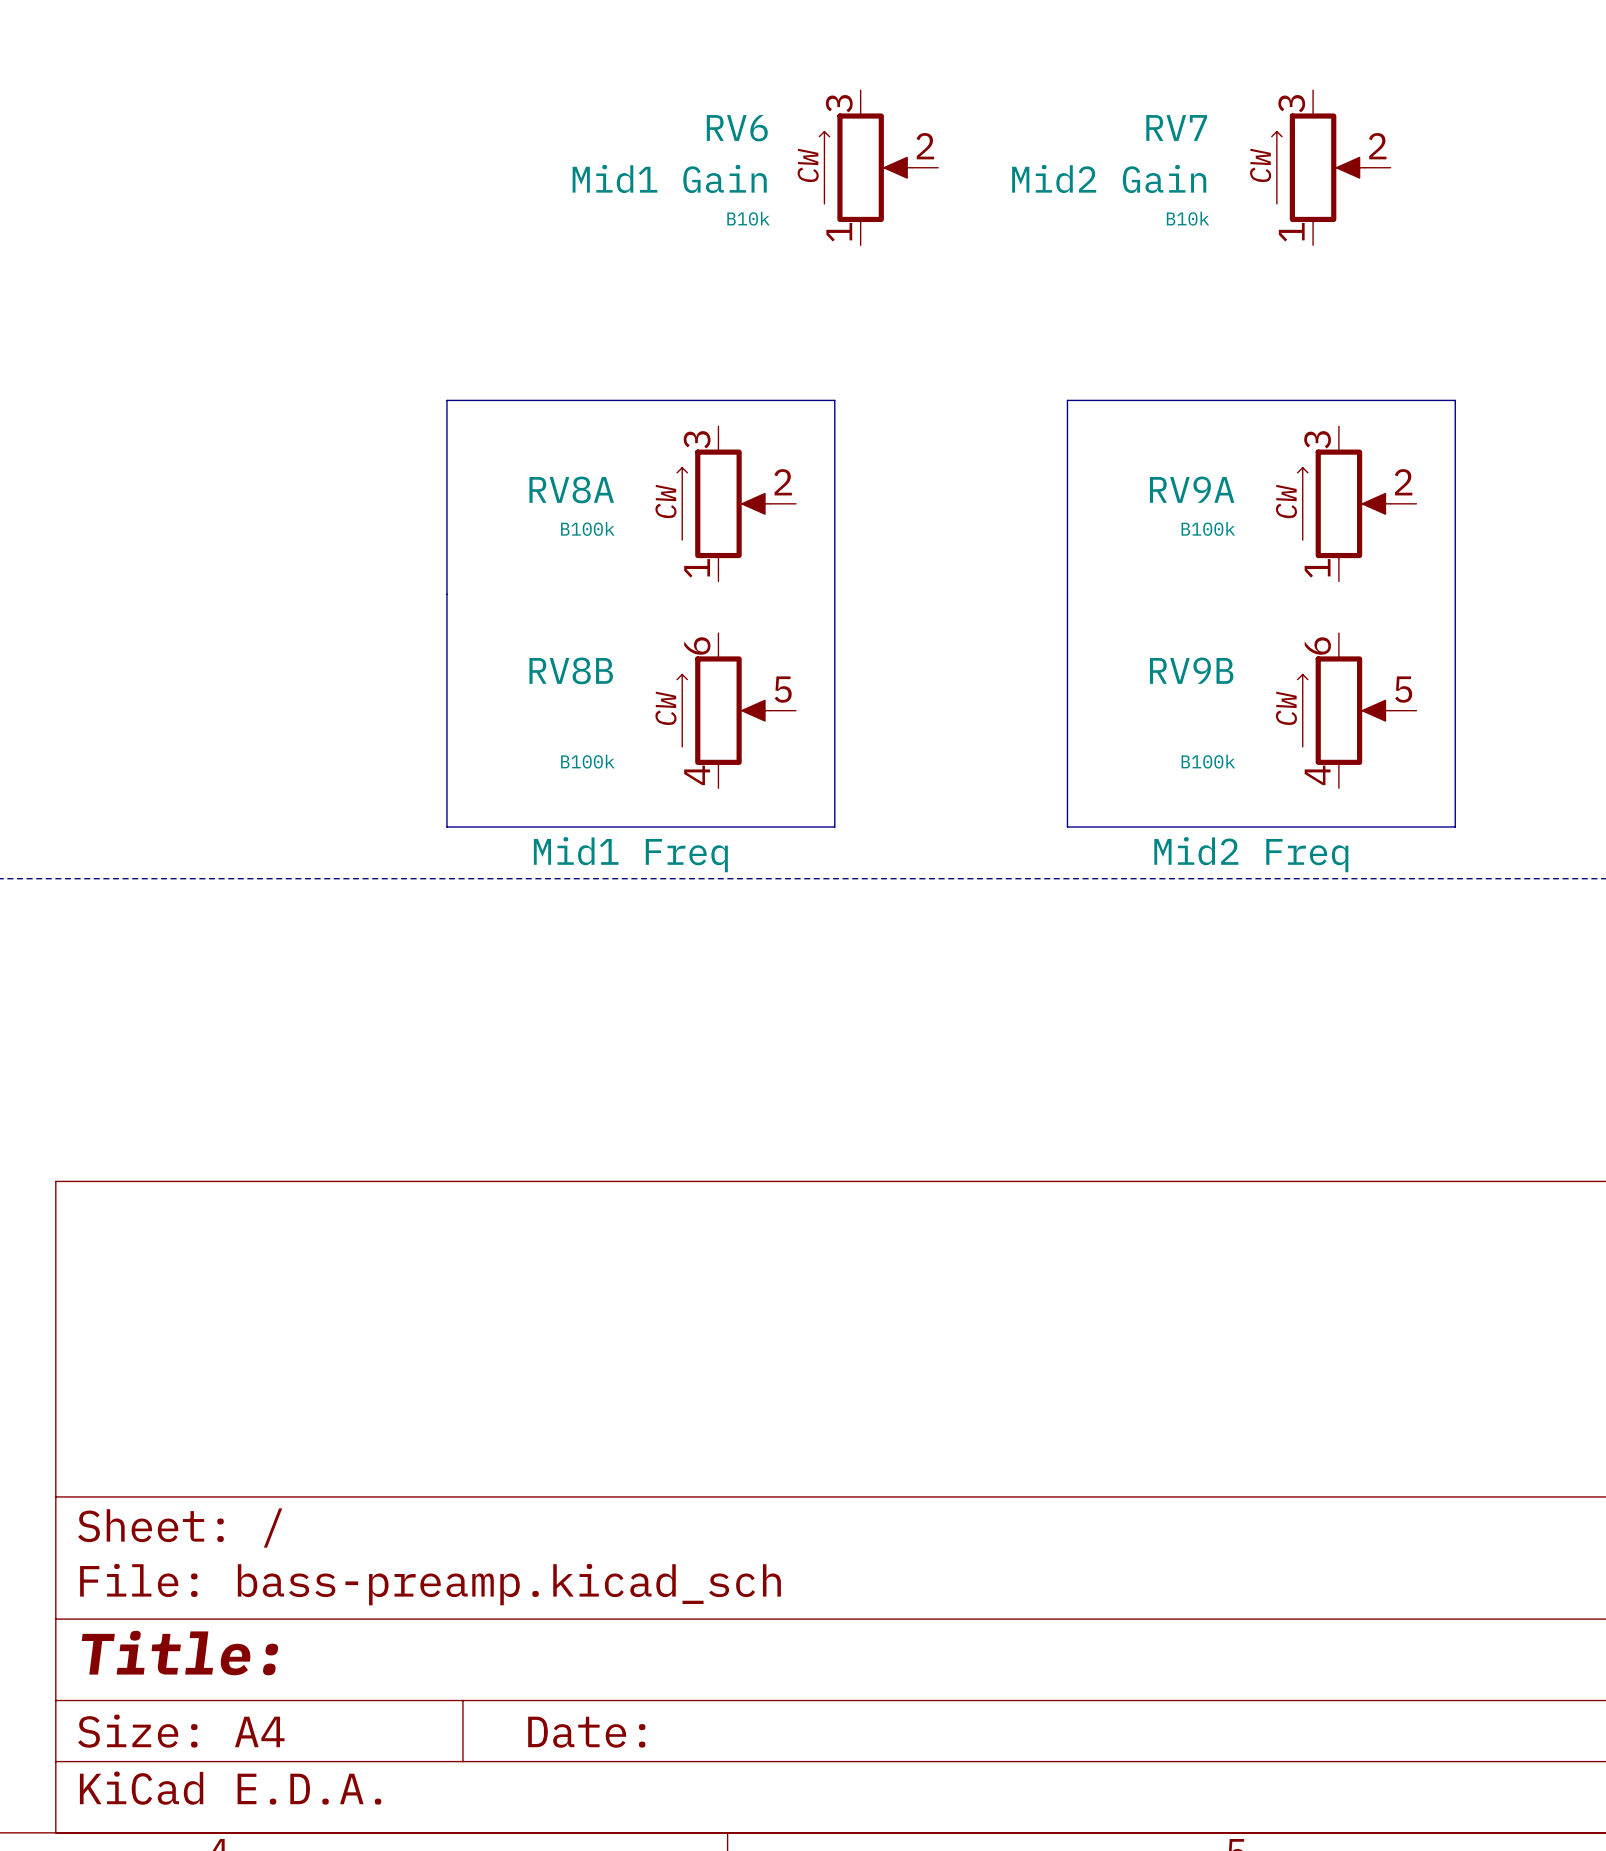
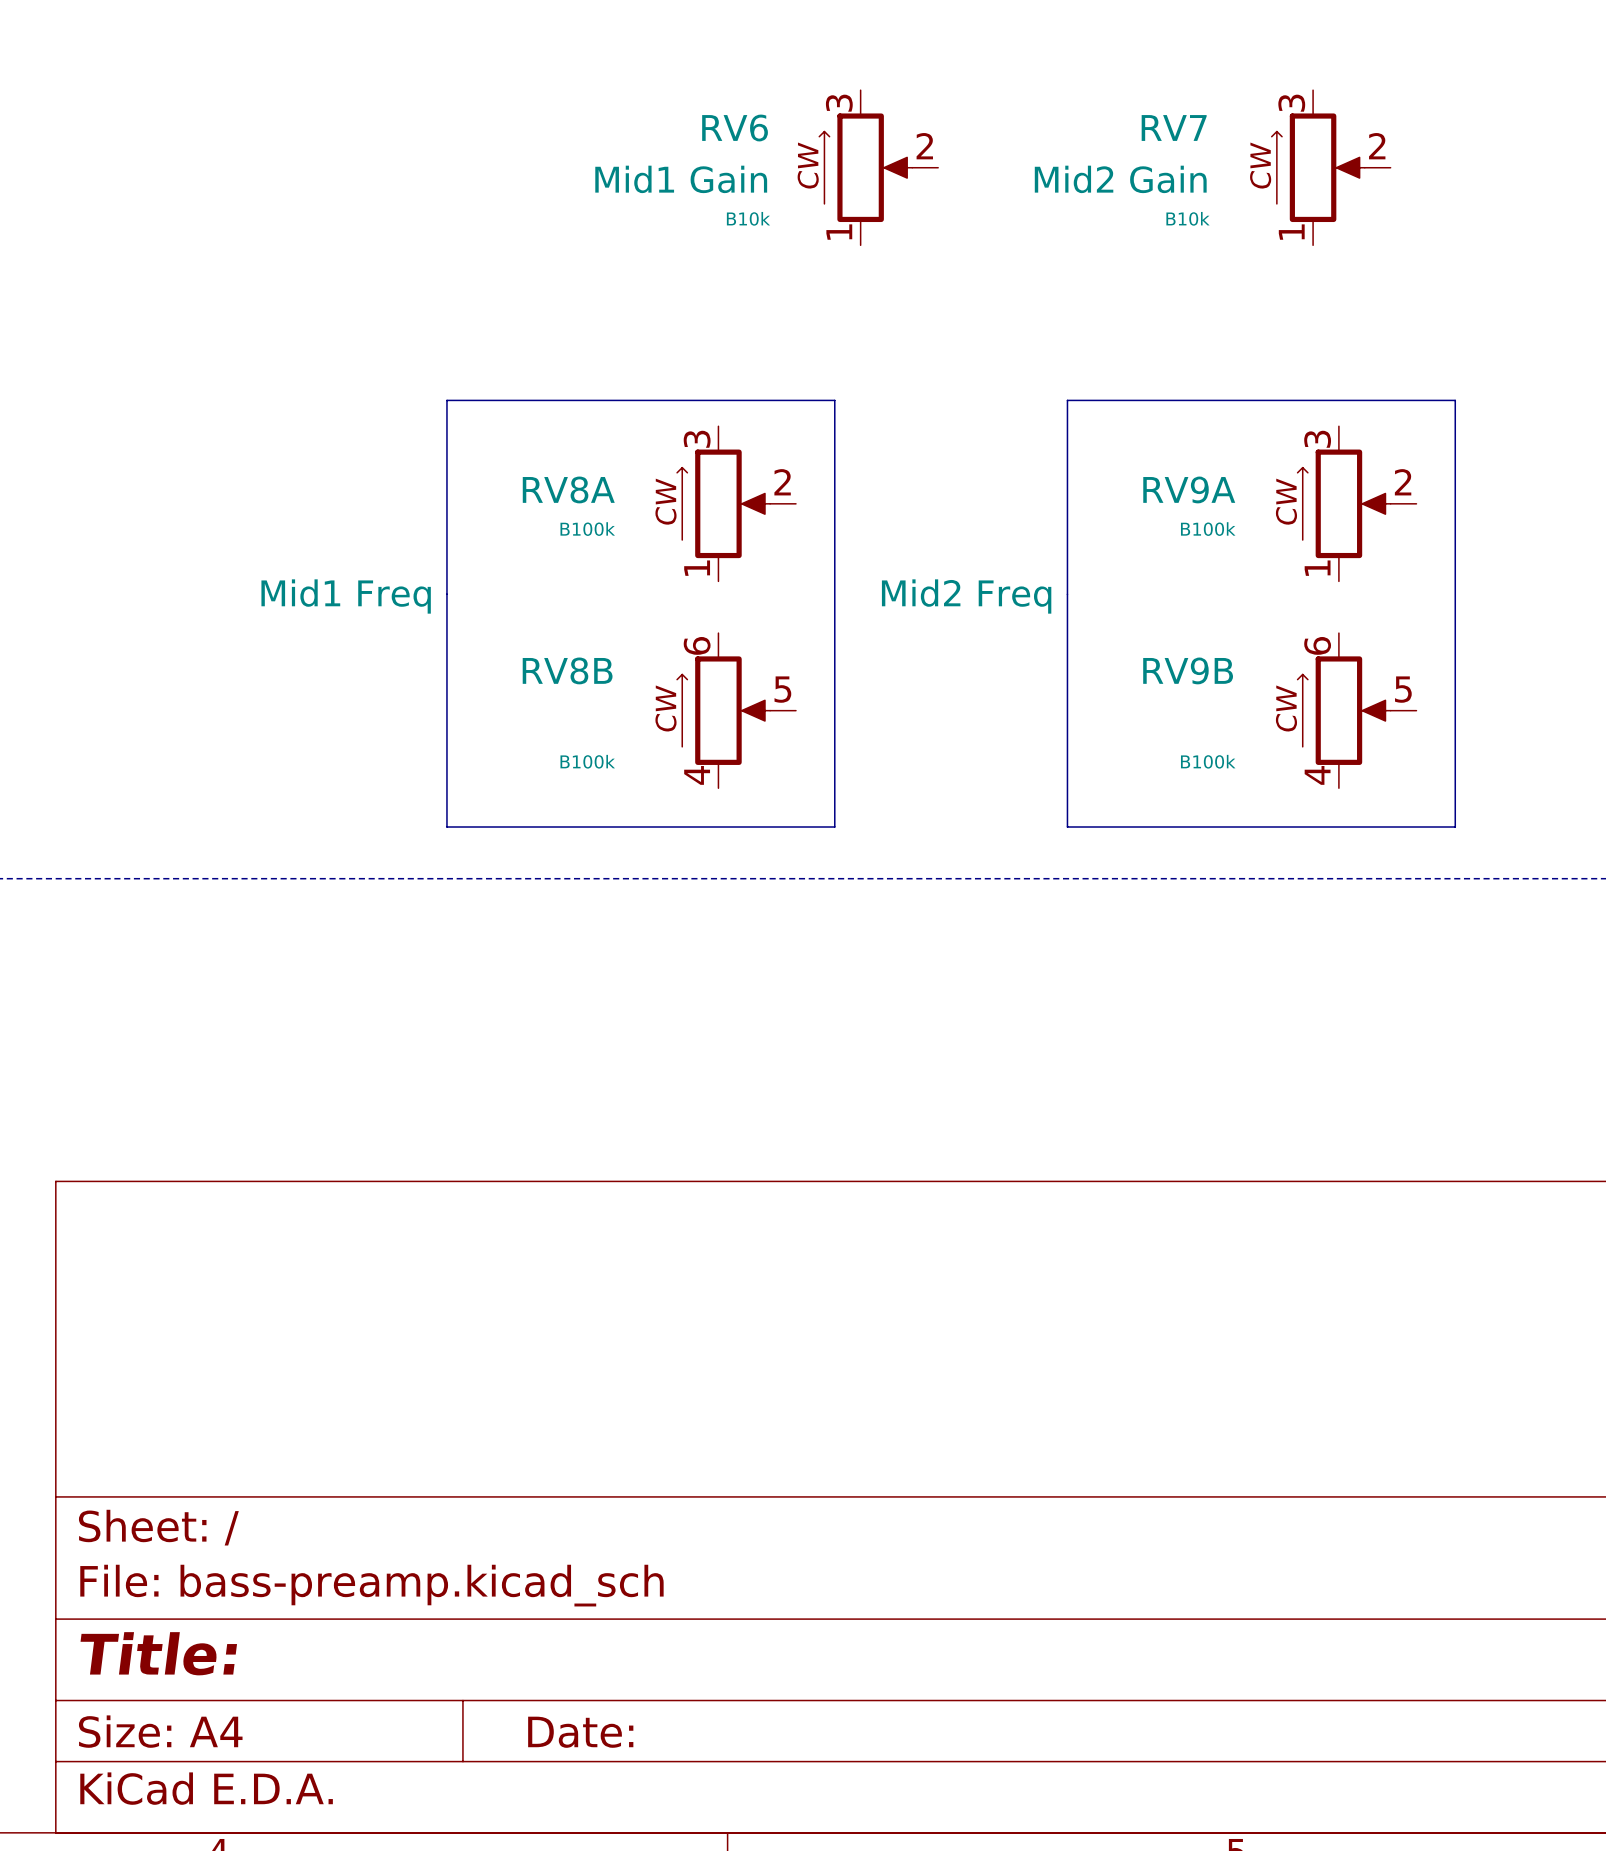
RV8B value position: Mid1 Freq (630, 854) -> Mid1 Freq (346, 596)
RV9B value position: Mid2 Freq (1251, 854) -> Mid2 Freq (966, 596)

